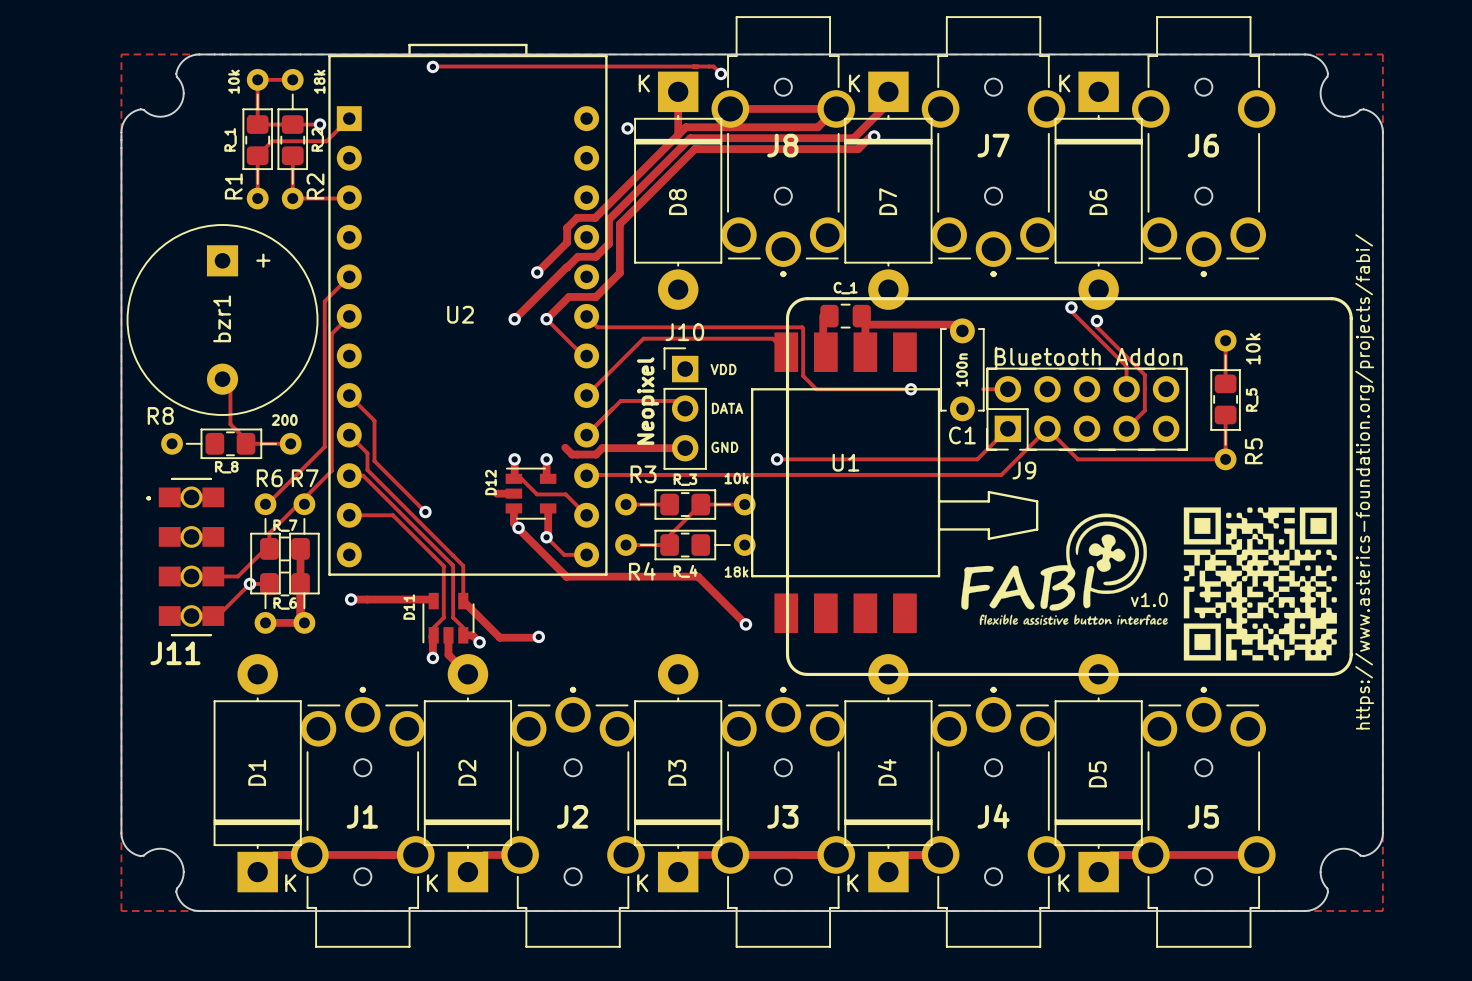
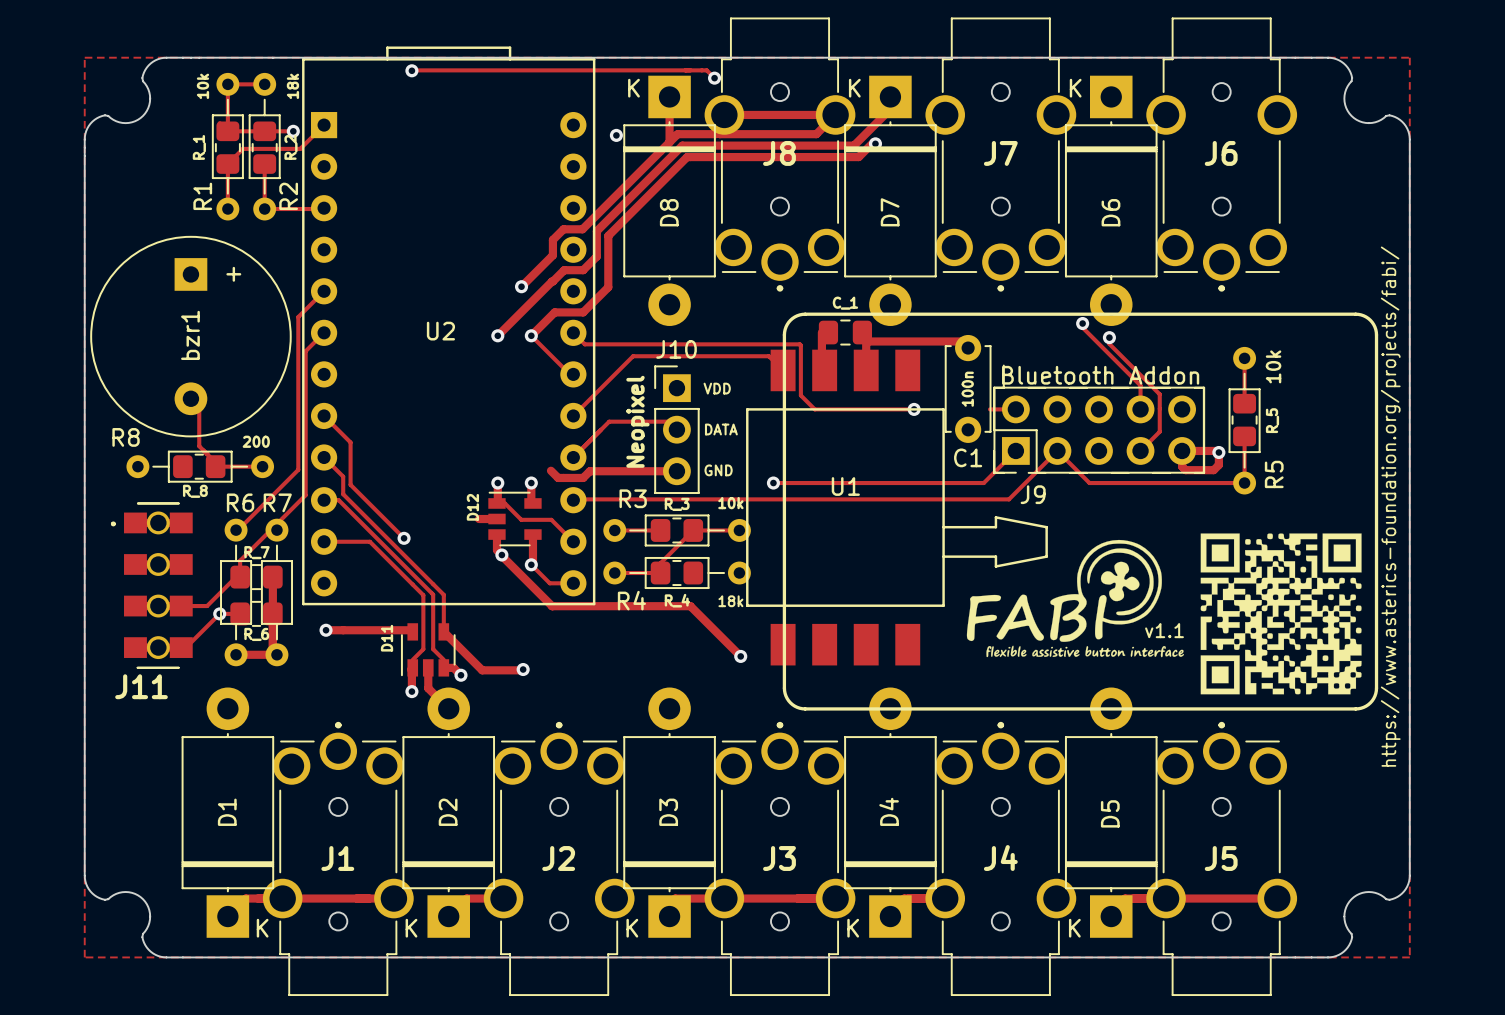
track: none -> (1182, 450) (1182, 466) (1185, 470) (1213, 470) (1218, 464) (1217, 450) (1182, 450)
via: none -> (1218, 452)
text: v1.0 (1149, 599) -> v1.1 (1164, 630)

